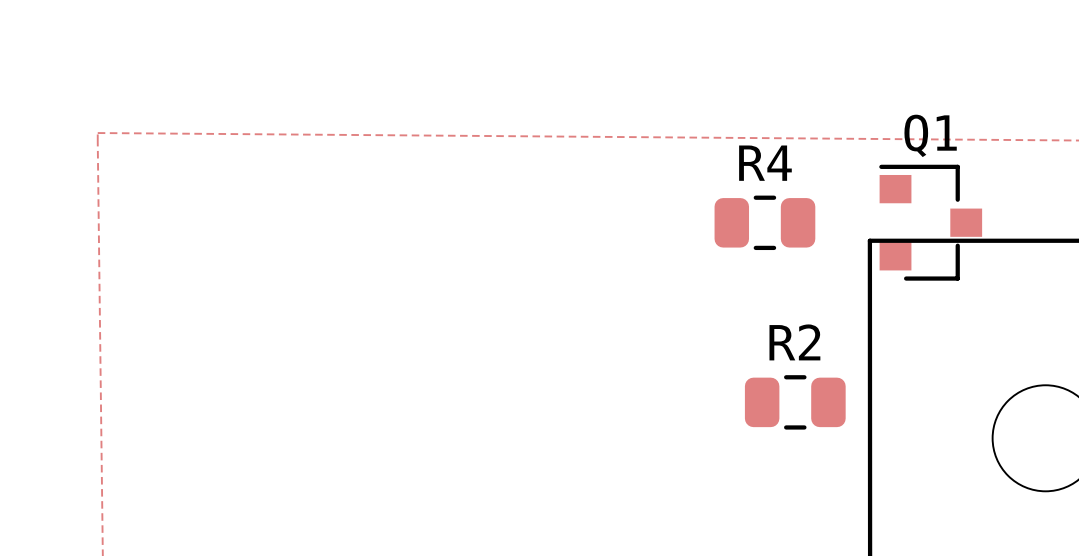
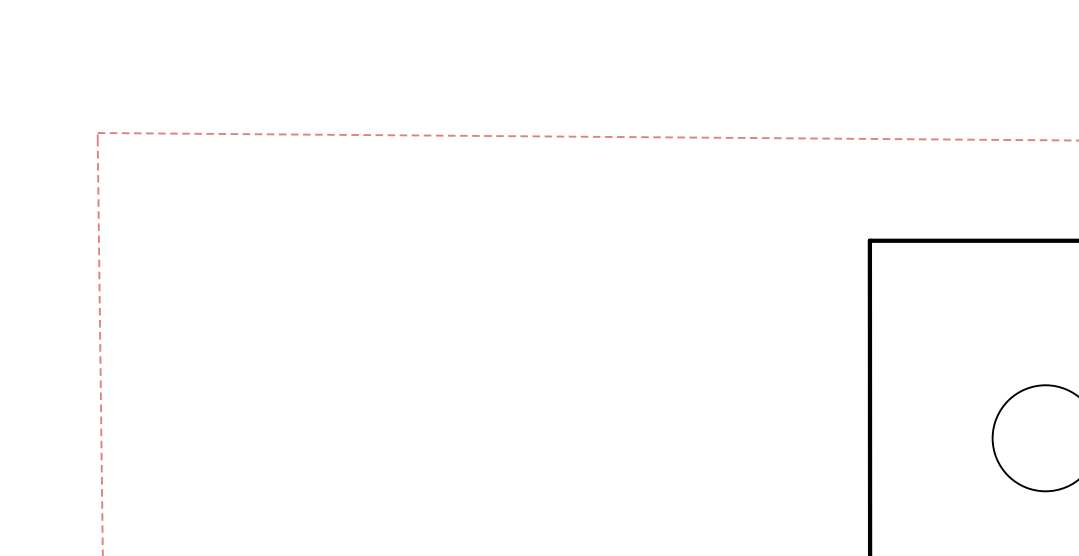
R4: (764, 222) -> none
Q1: (930, 222) -> none
R2: (795, 402) -> none

